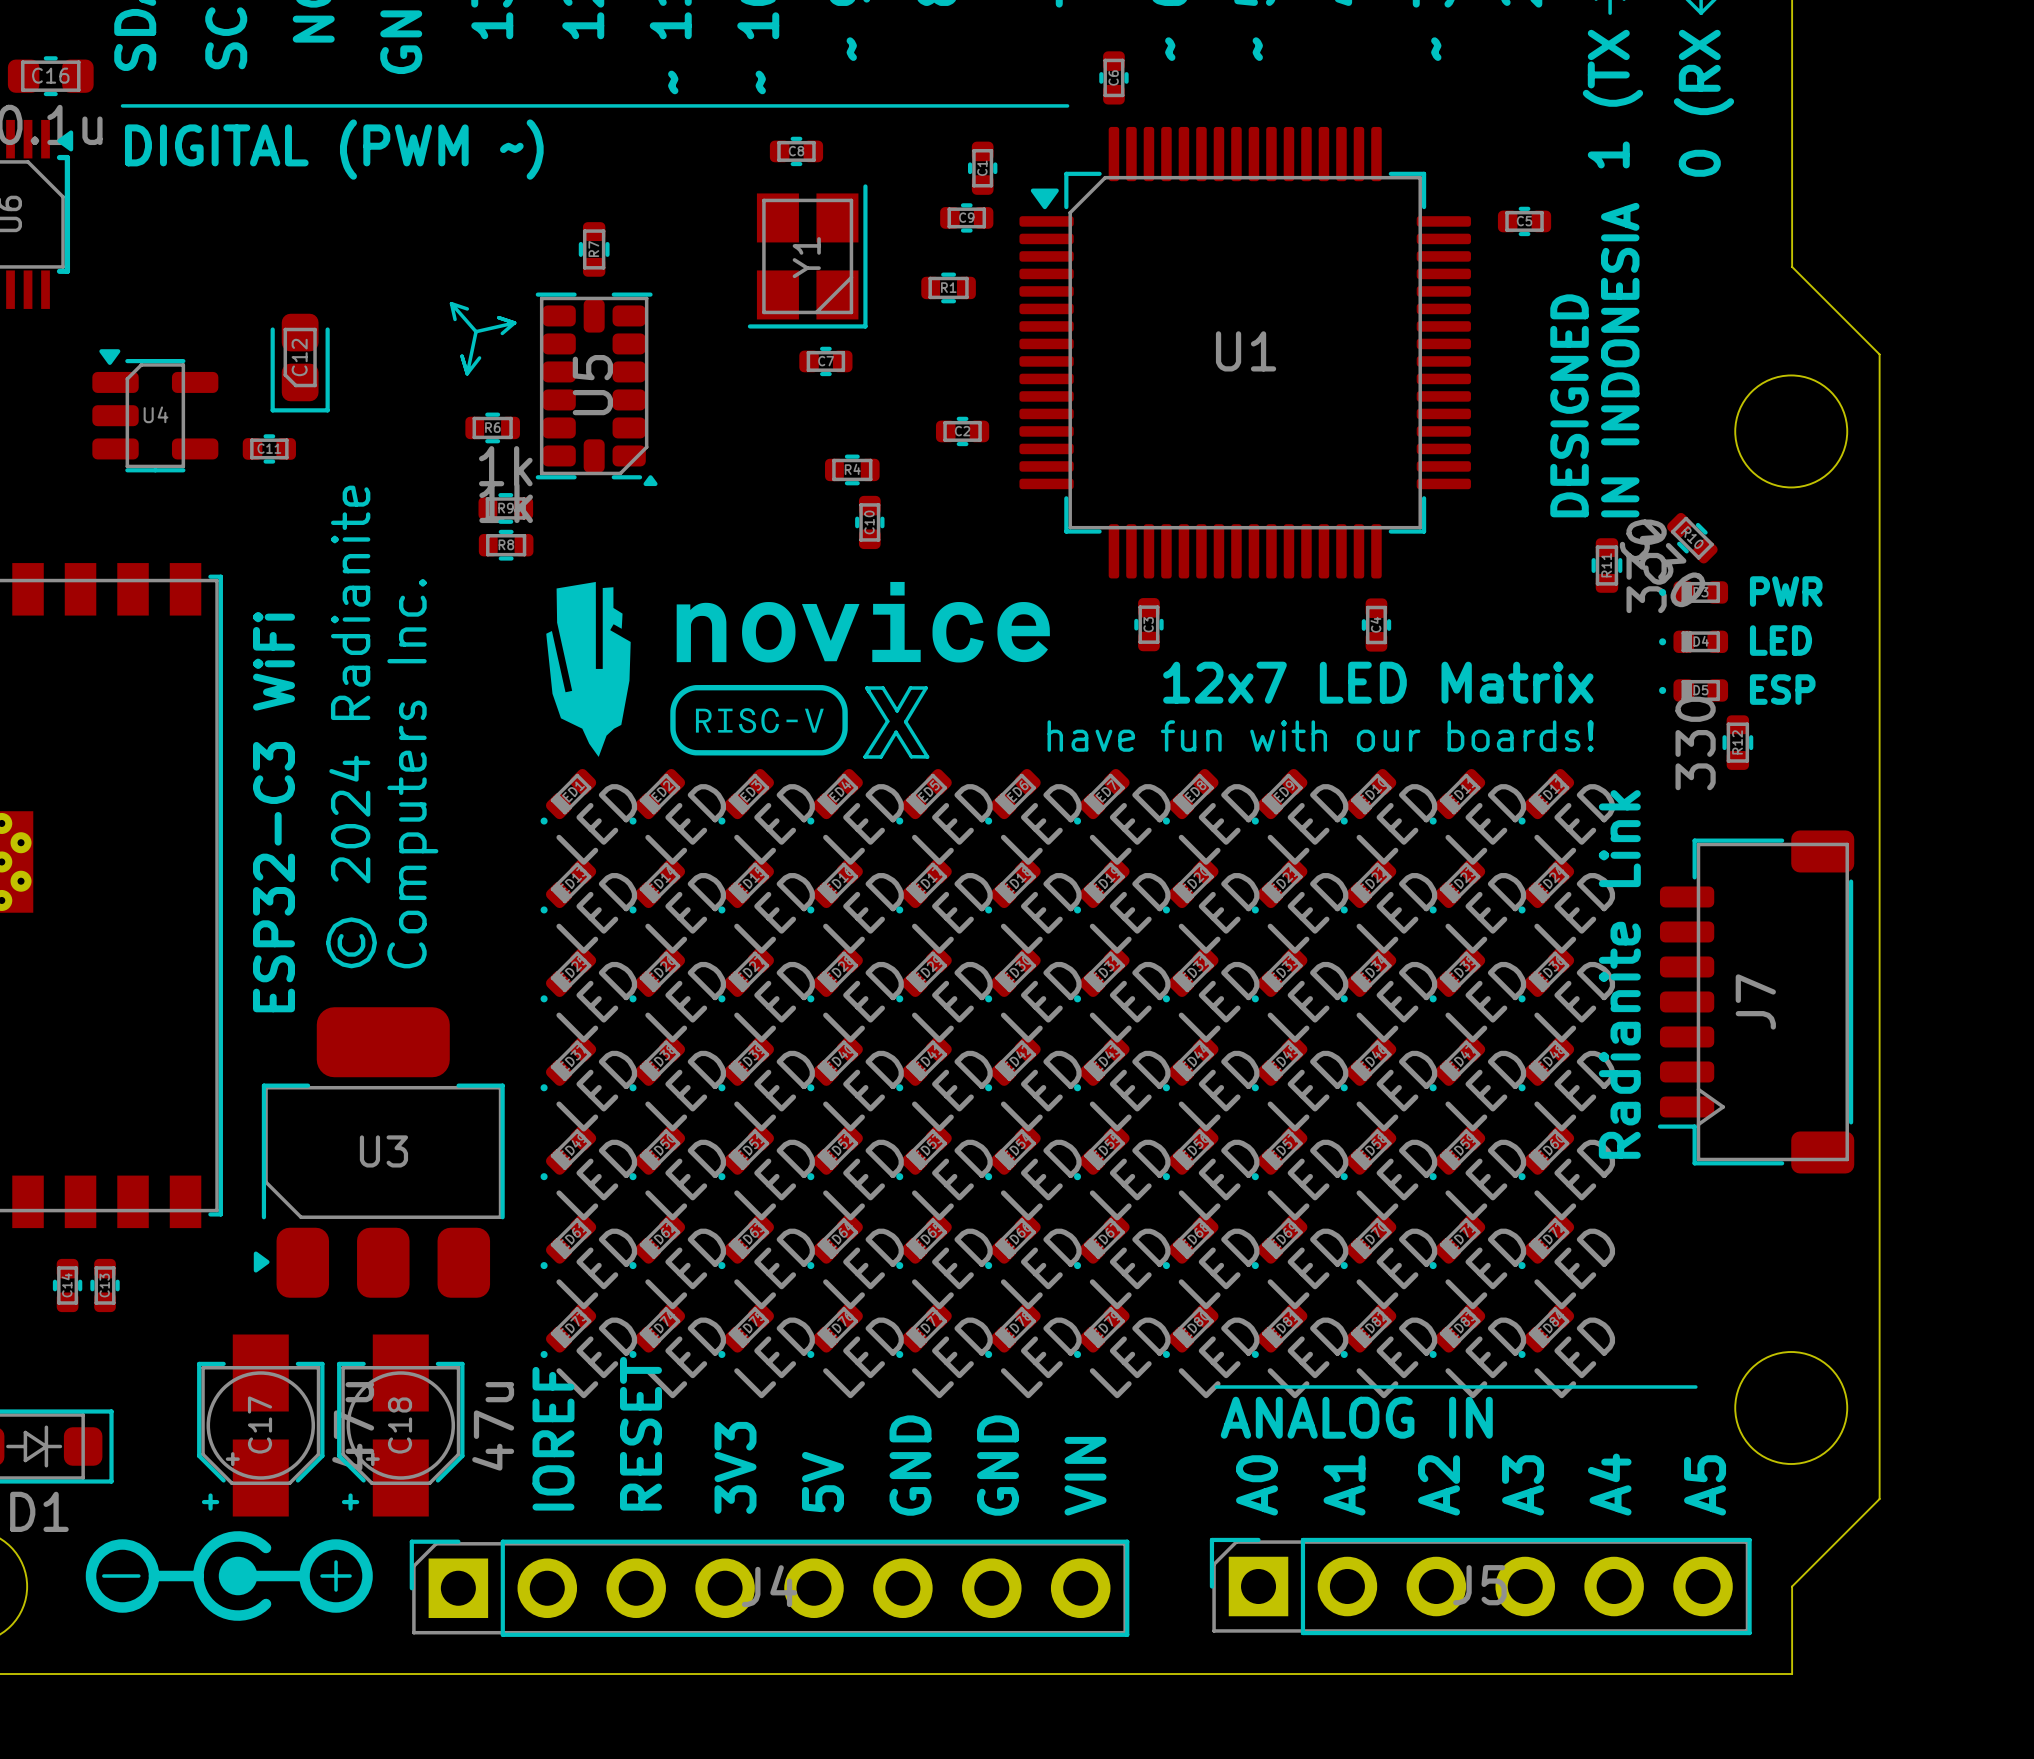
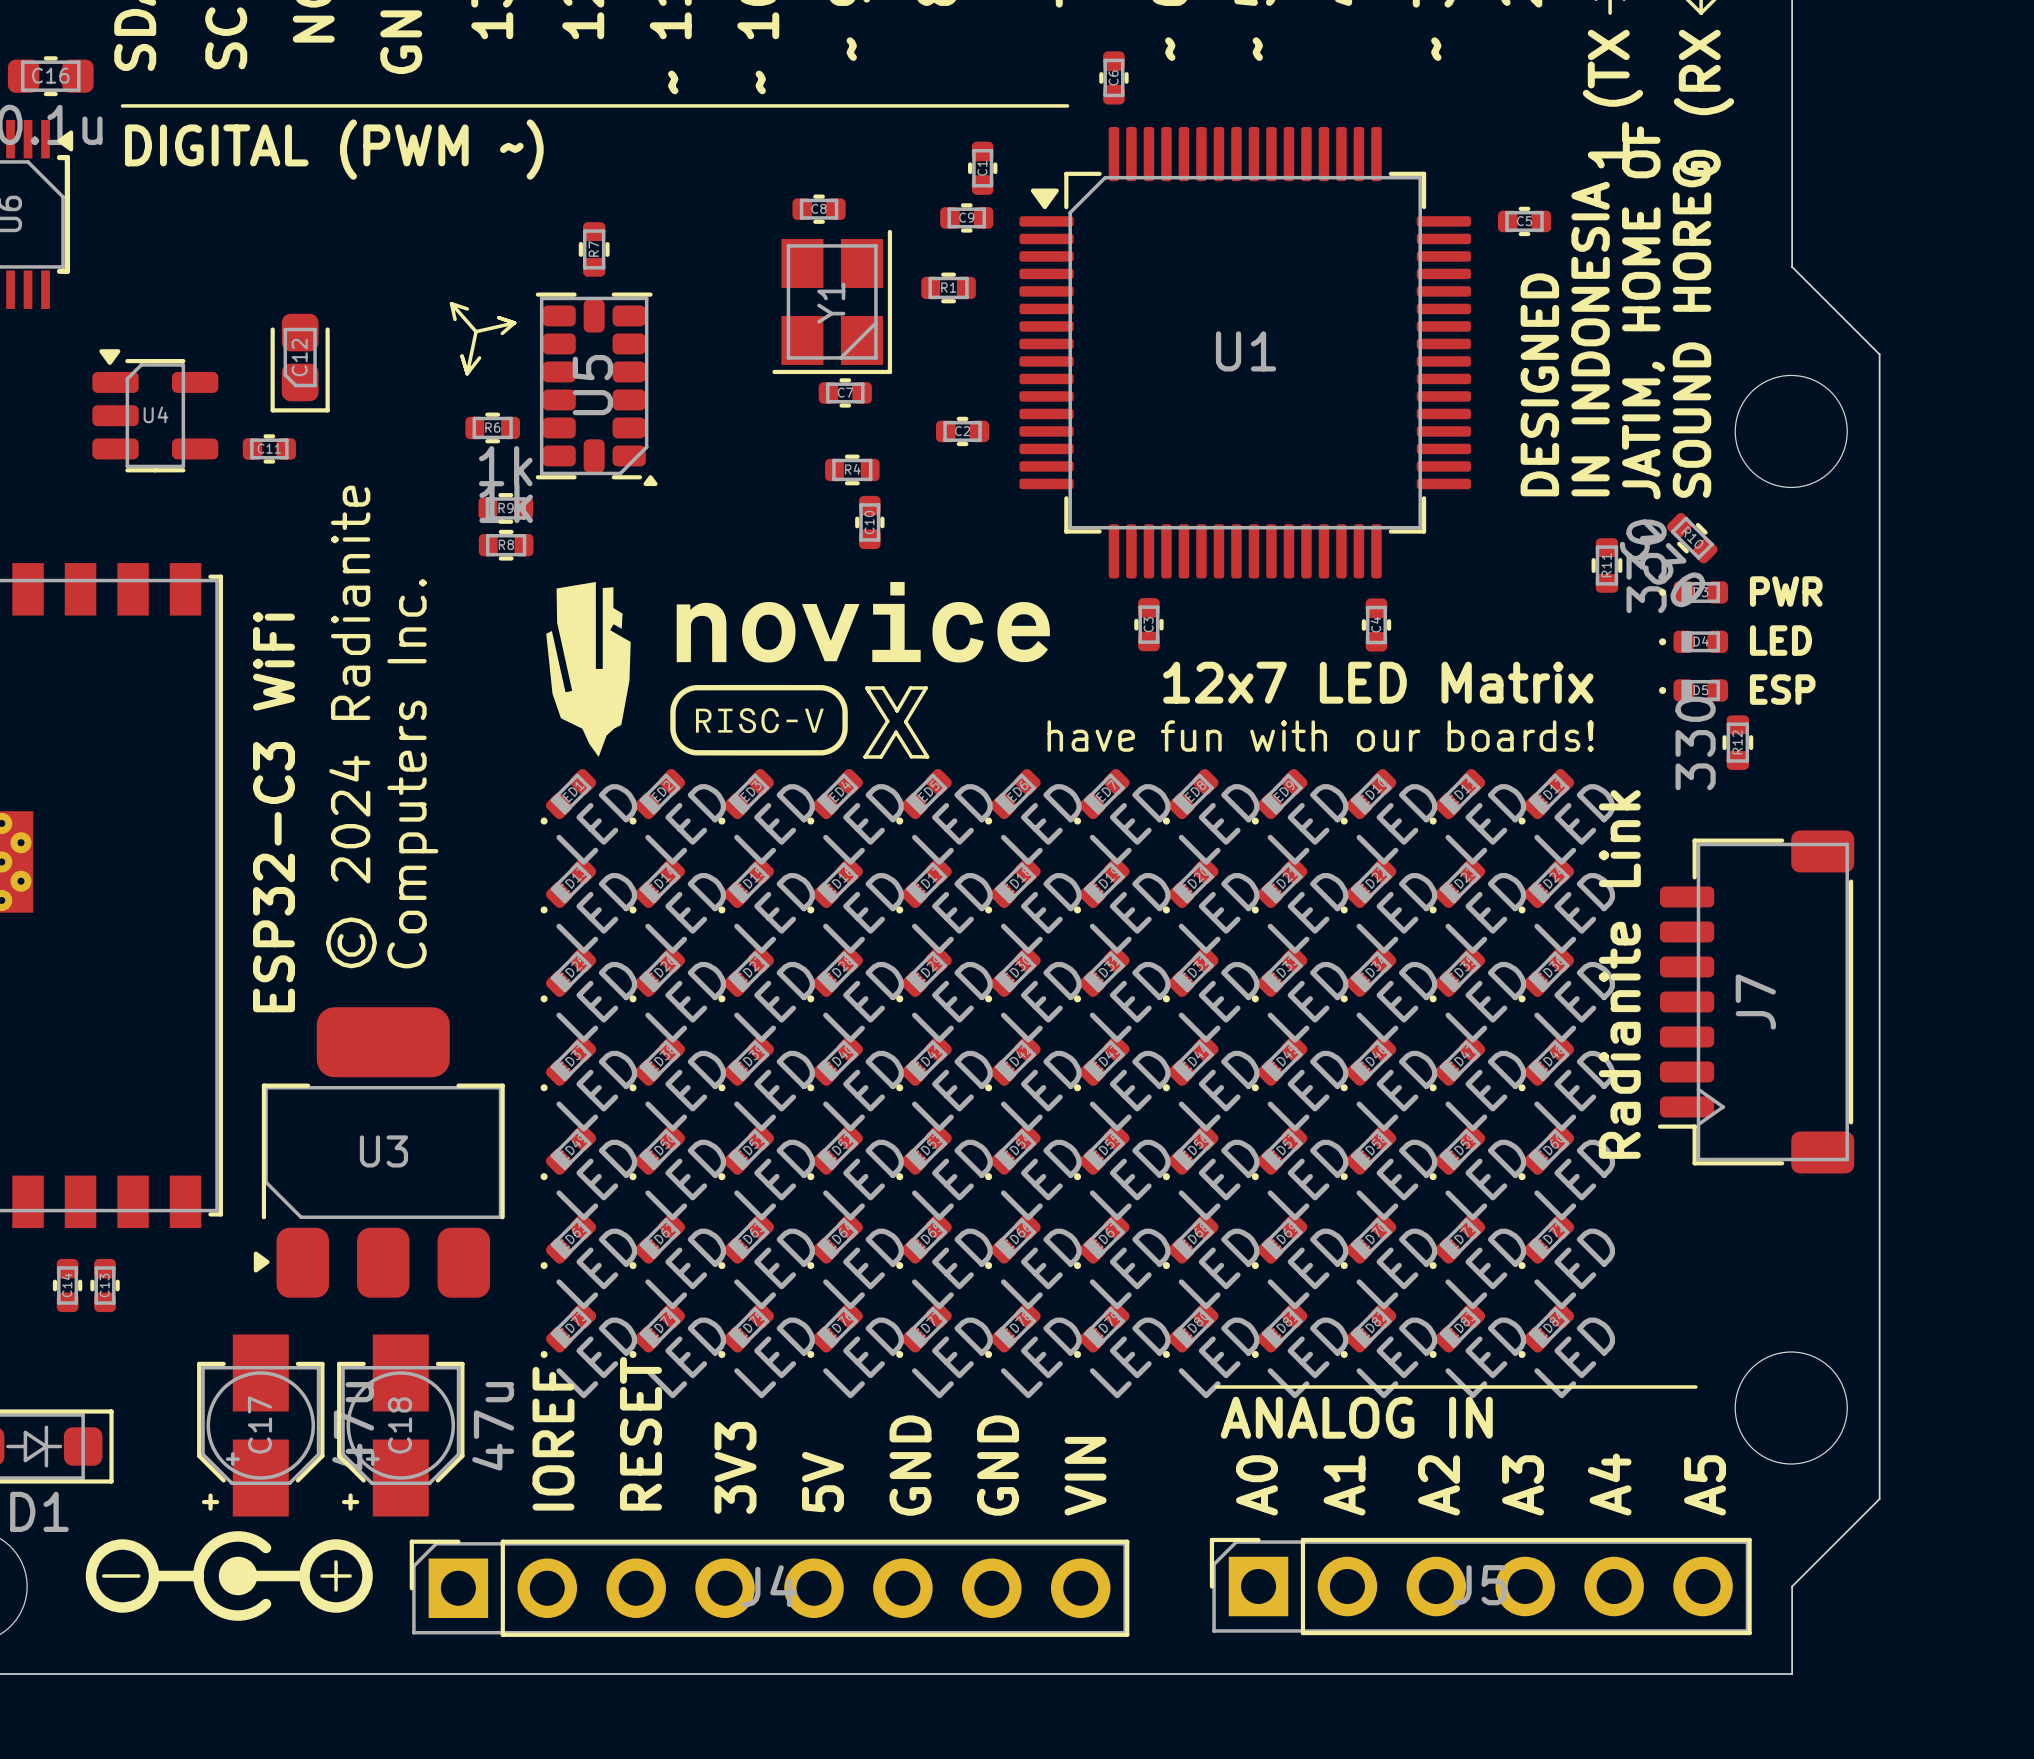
C8 position: (796, 151) -> (819, 209)
Y1 position: (807, 256) -> (832, 301)
text: none -> JATIM, HOME OF (1643, 310)
text: none -> SOUND HOREG (1692, 329)
text position: IN INDONESIA (1620, 360) -> IN INDONESIA (1590, 339)
C7 position: (825, 361) -> (845, 392)
text position: DESIGNED (1569, 405) -> DESIGNED (1539, 384)

